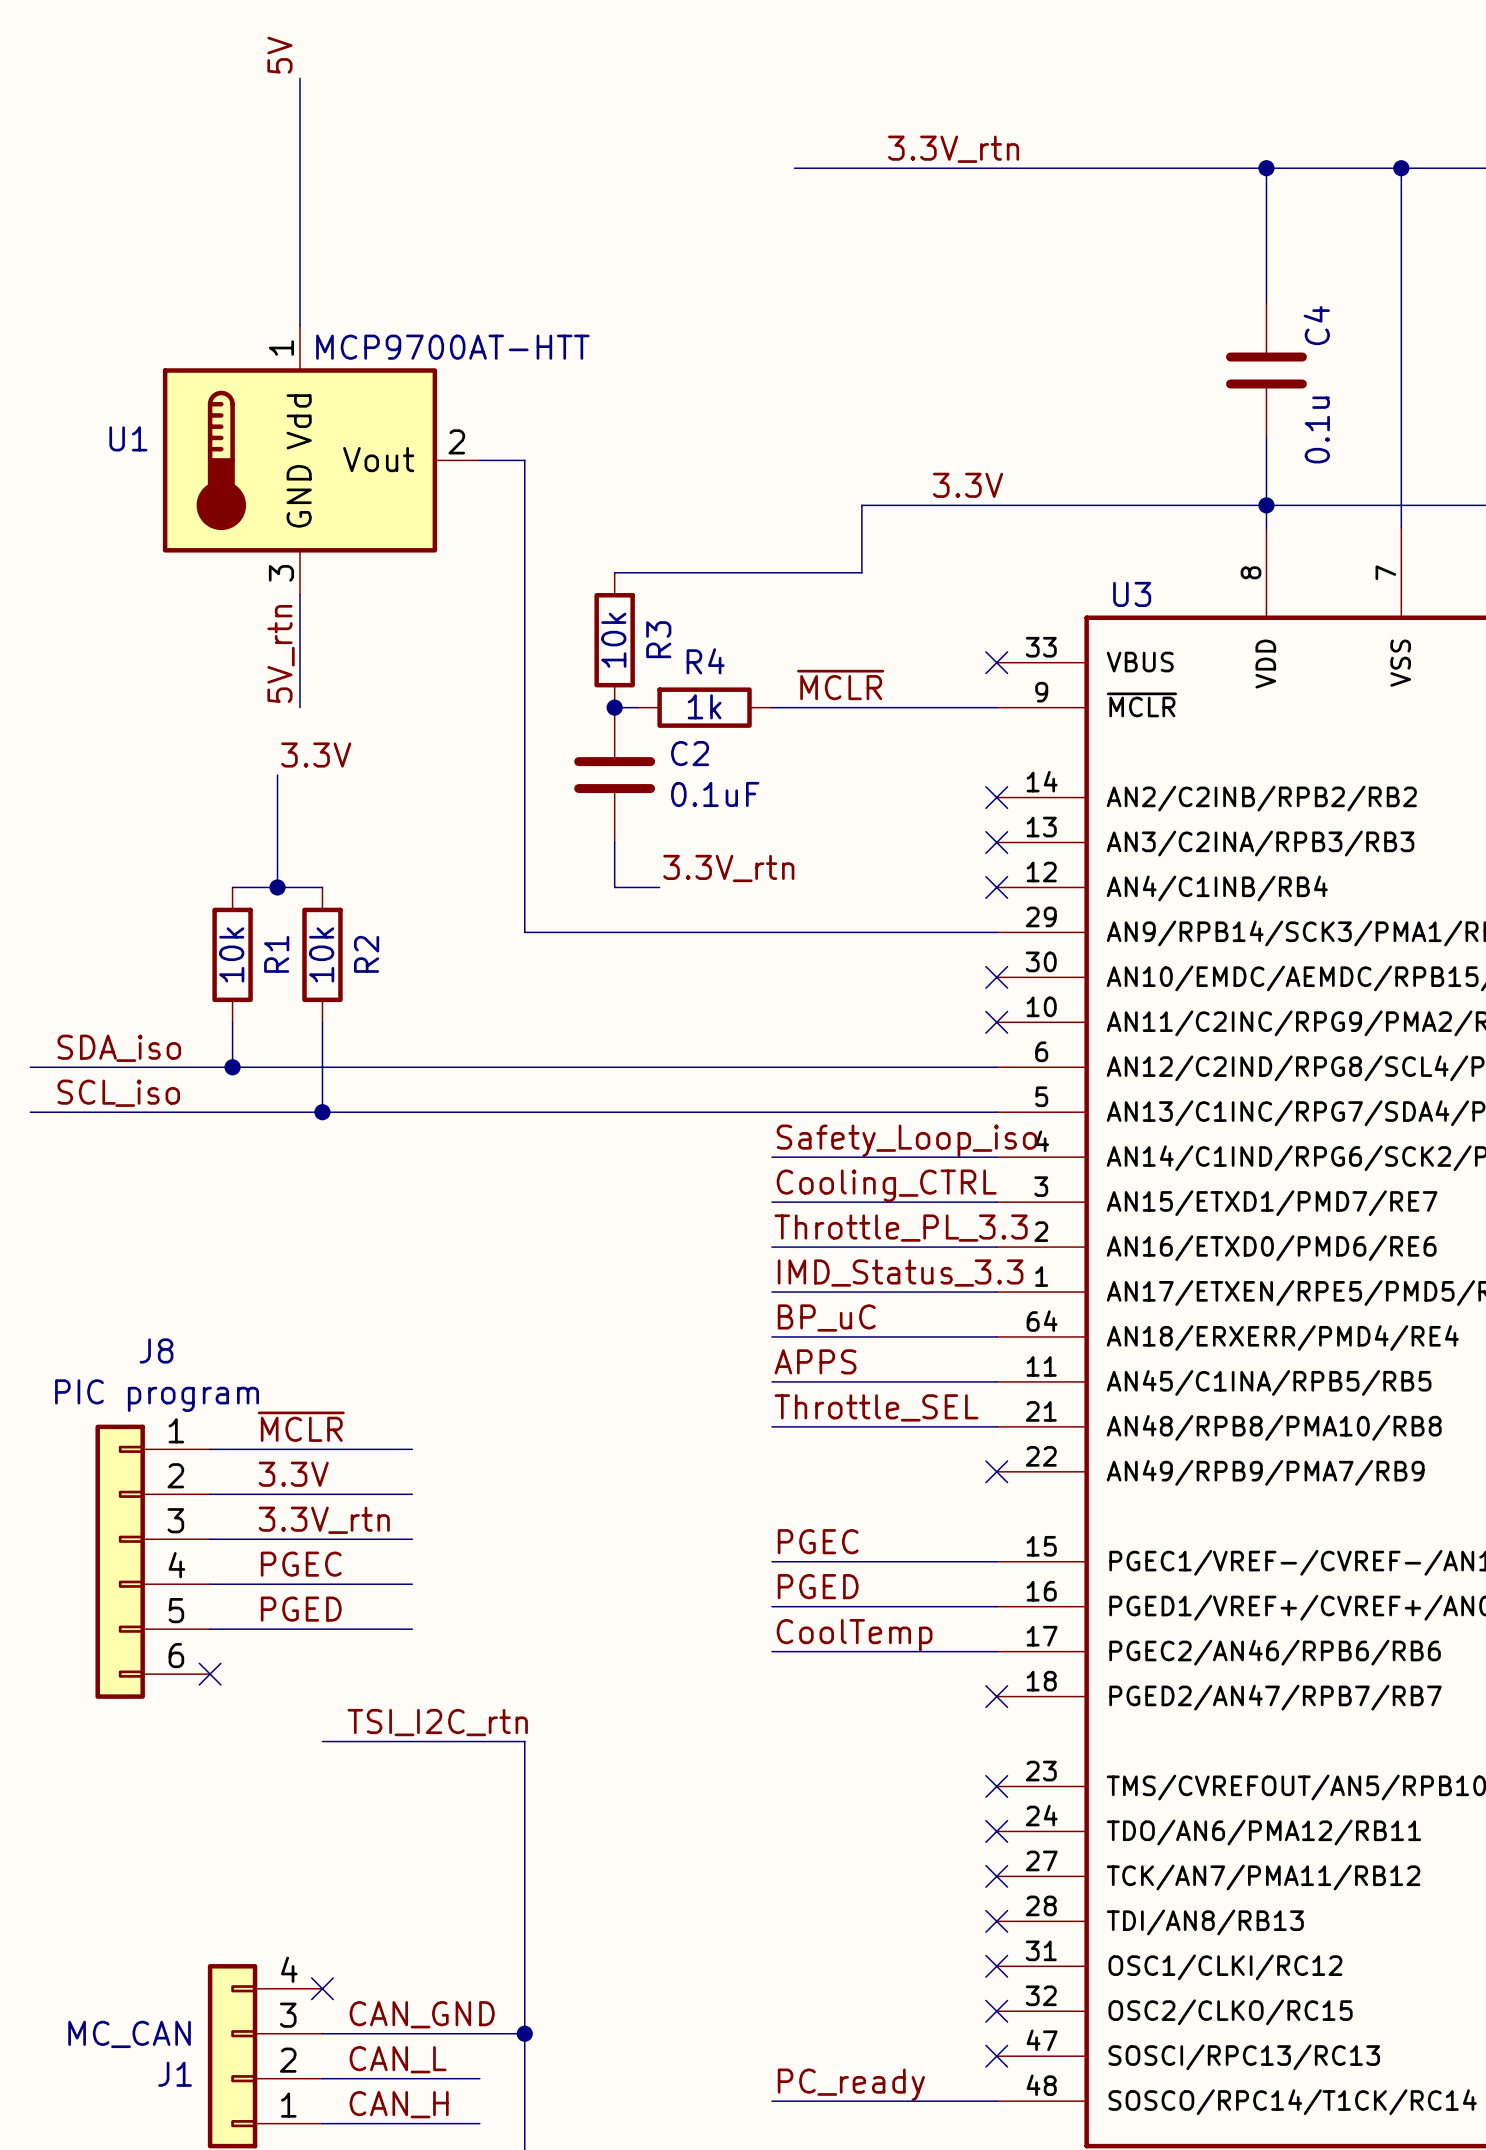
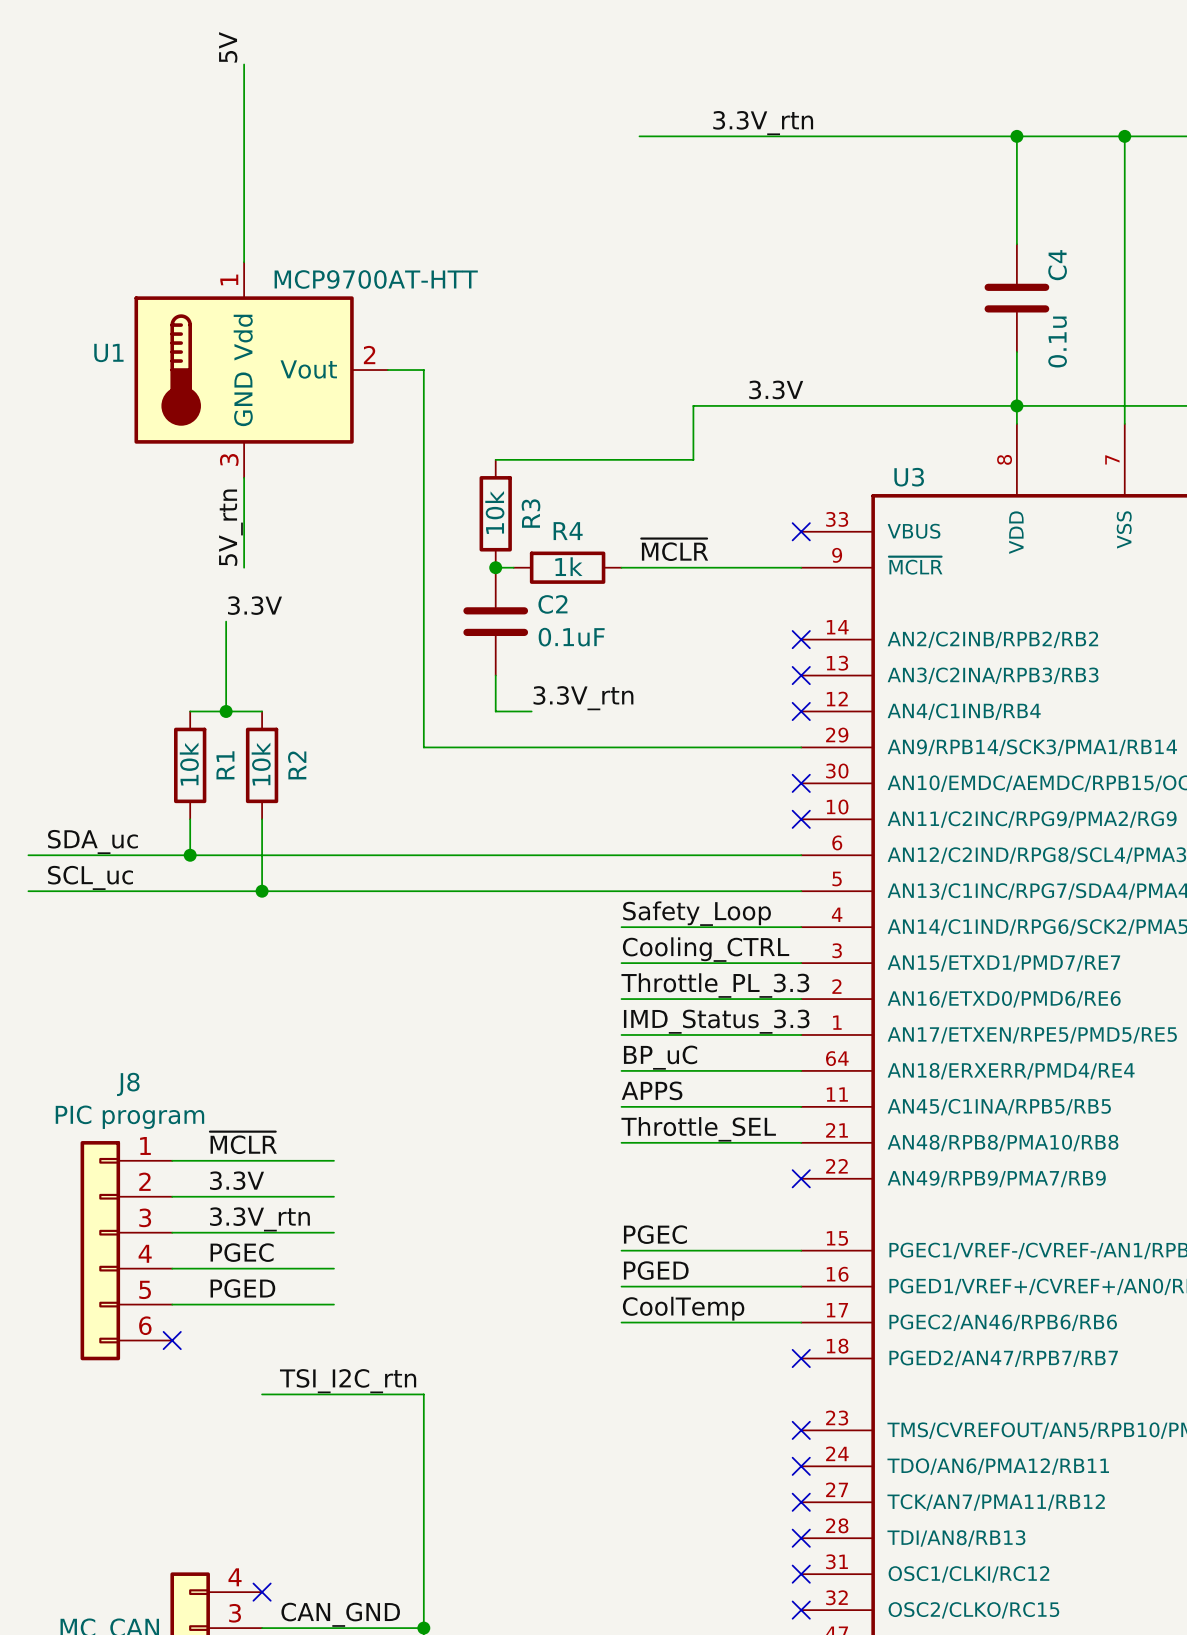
label: SDA_iso (119, 1048) -> SDA_uc (92, 841)
label: SCL_iso (118, 1093) -> SCL_uc (90, 877)
label: Safety_Loop_iso (907, 1140) -> Safety_Loop (697, 913)

